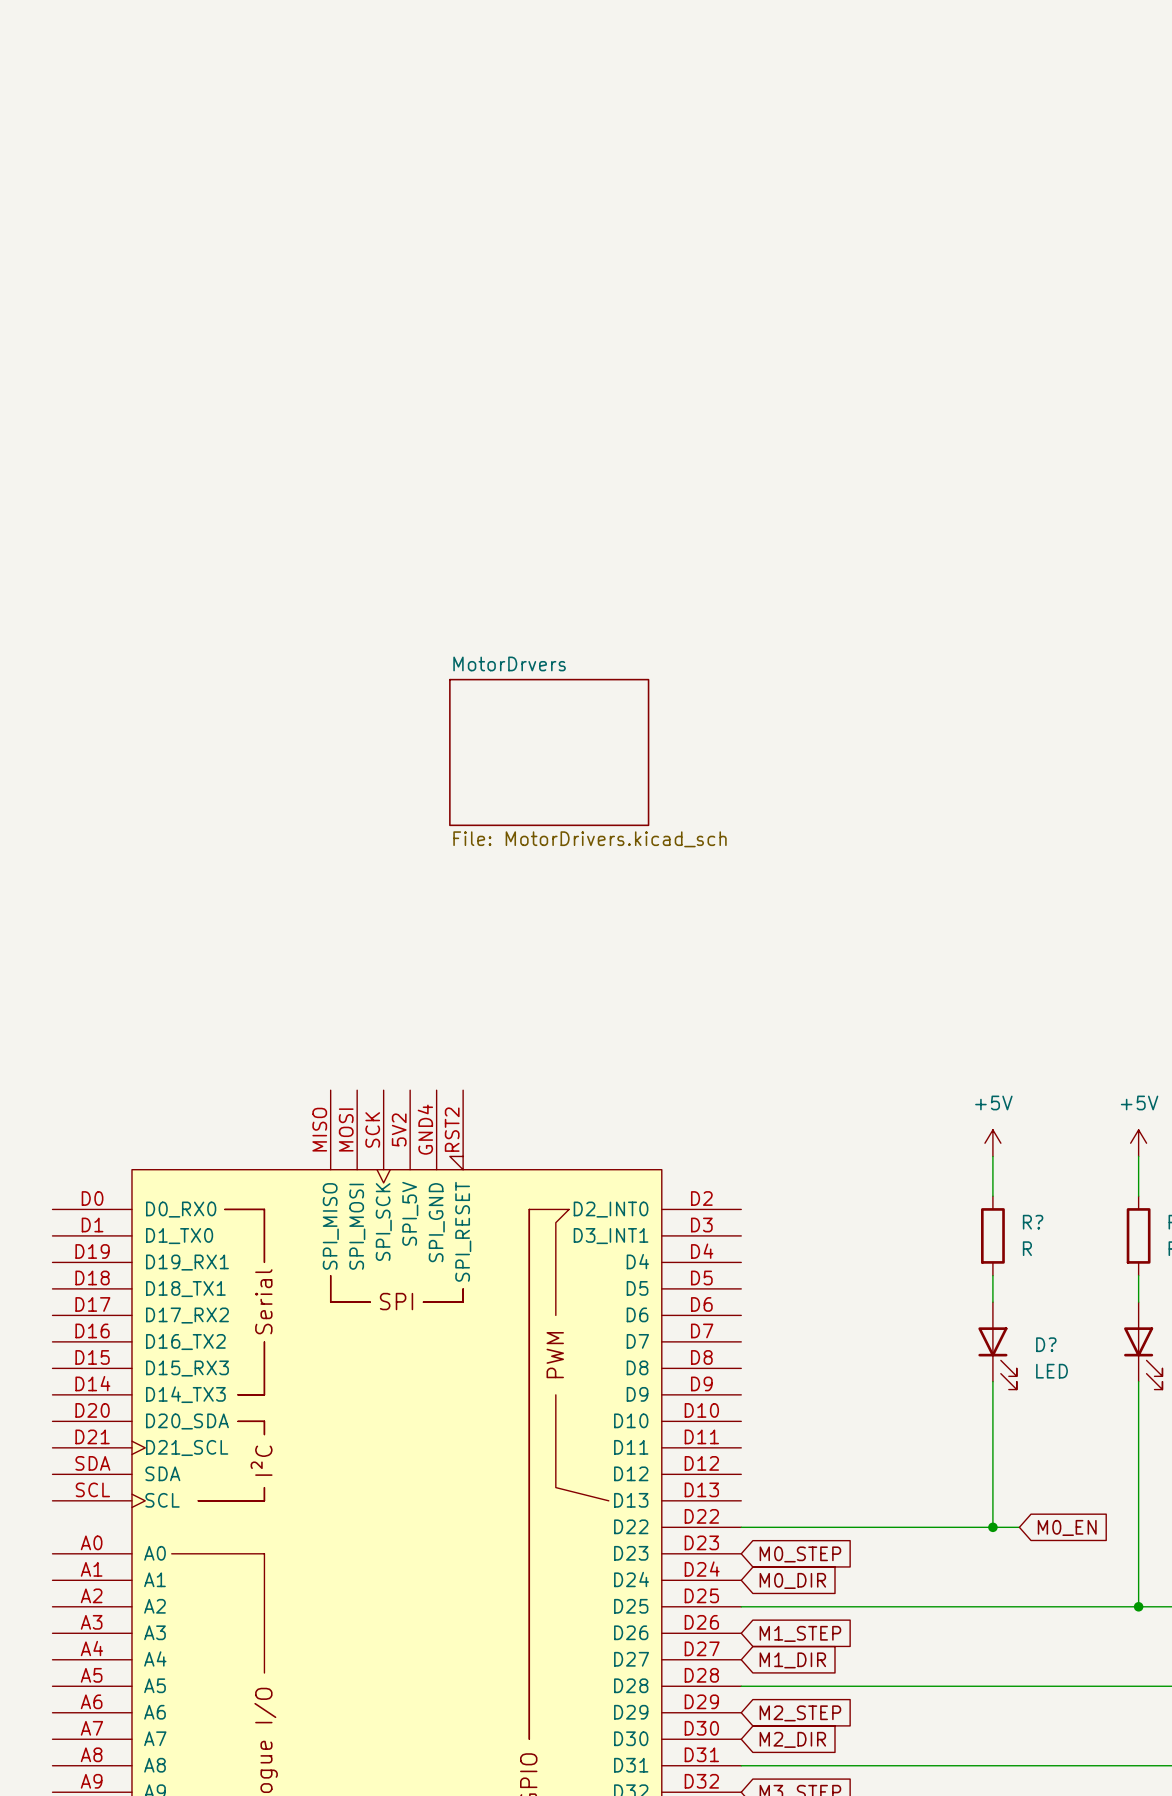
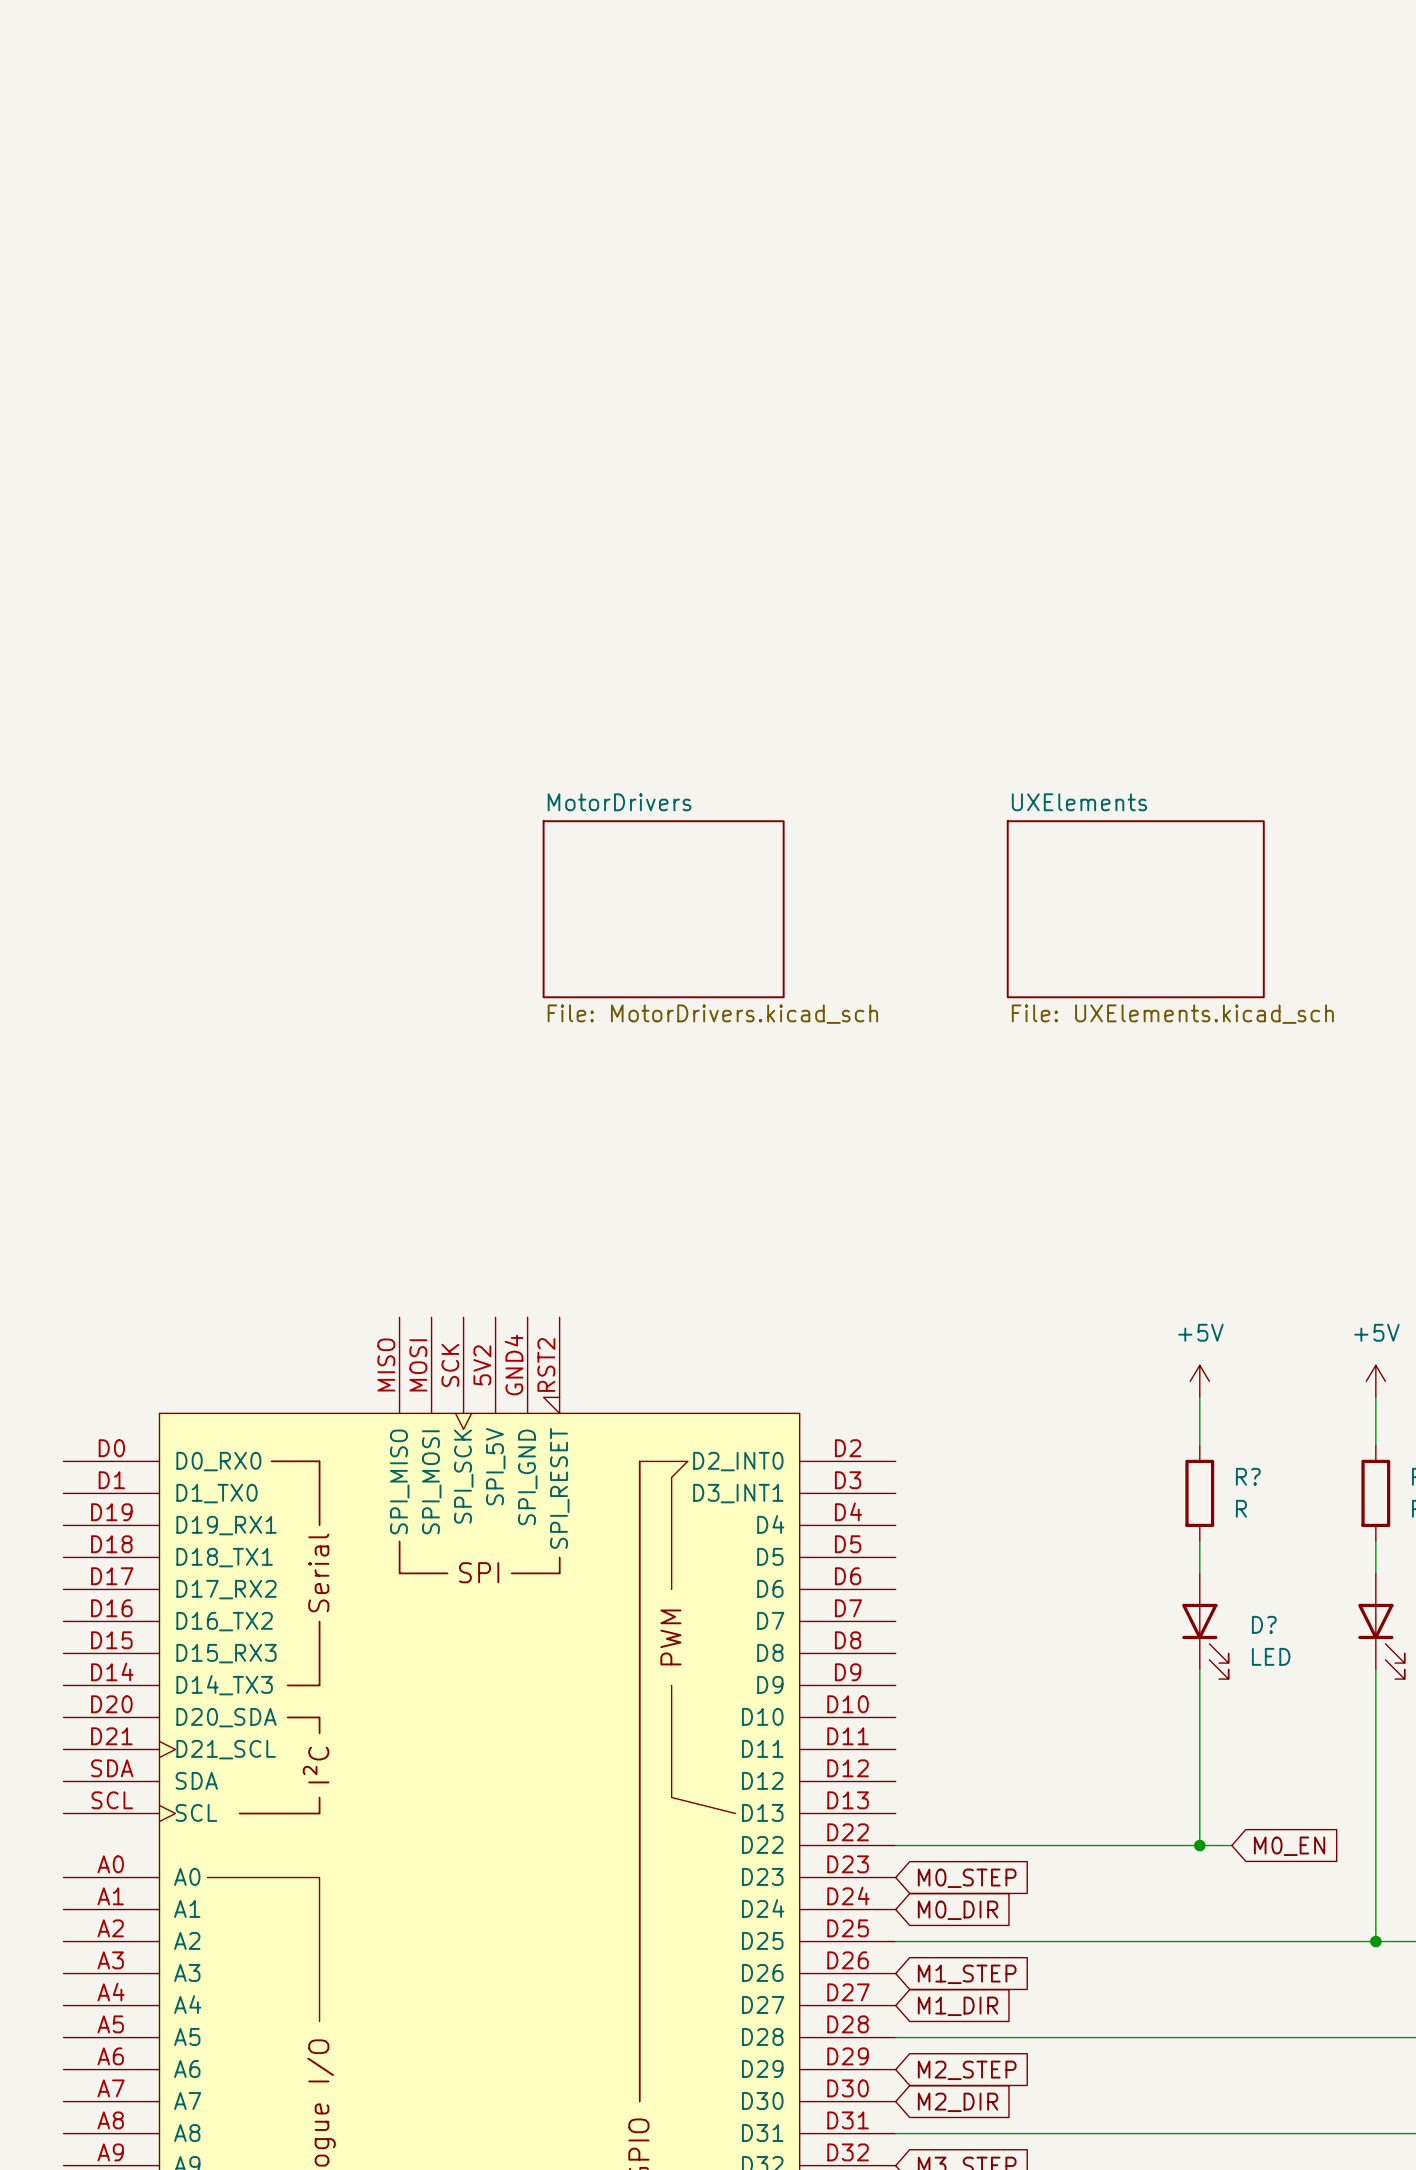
sheet MotorDrvers name: MotorDrvers (509, 663) -> MotorDrivers (619, 802)
sheet UXElements: none -> File: UXElements.kicad_sch (1135, 909)

